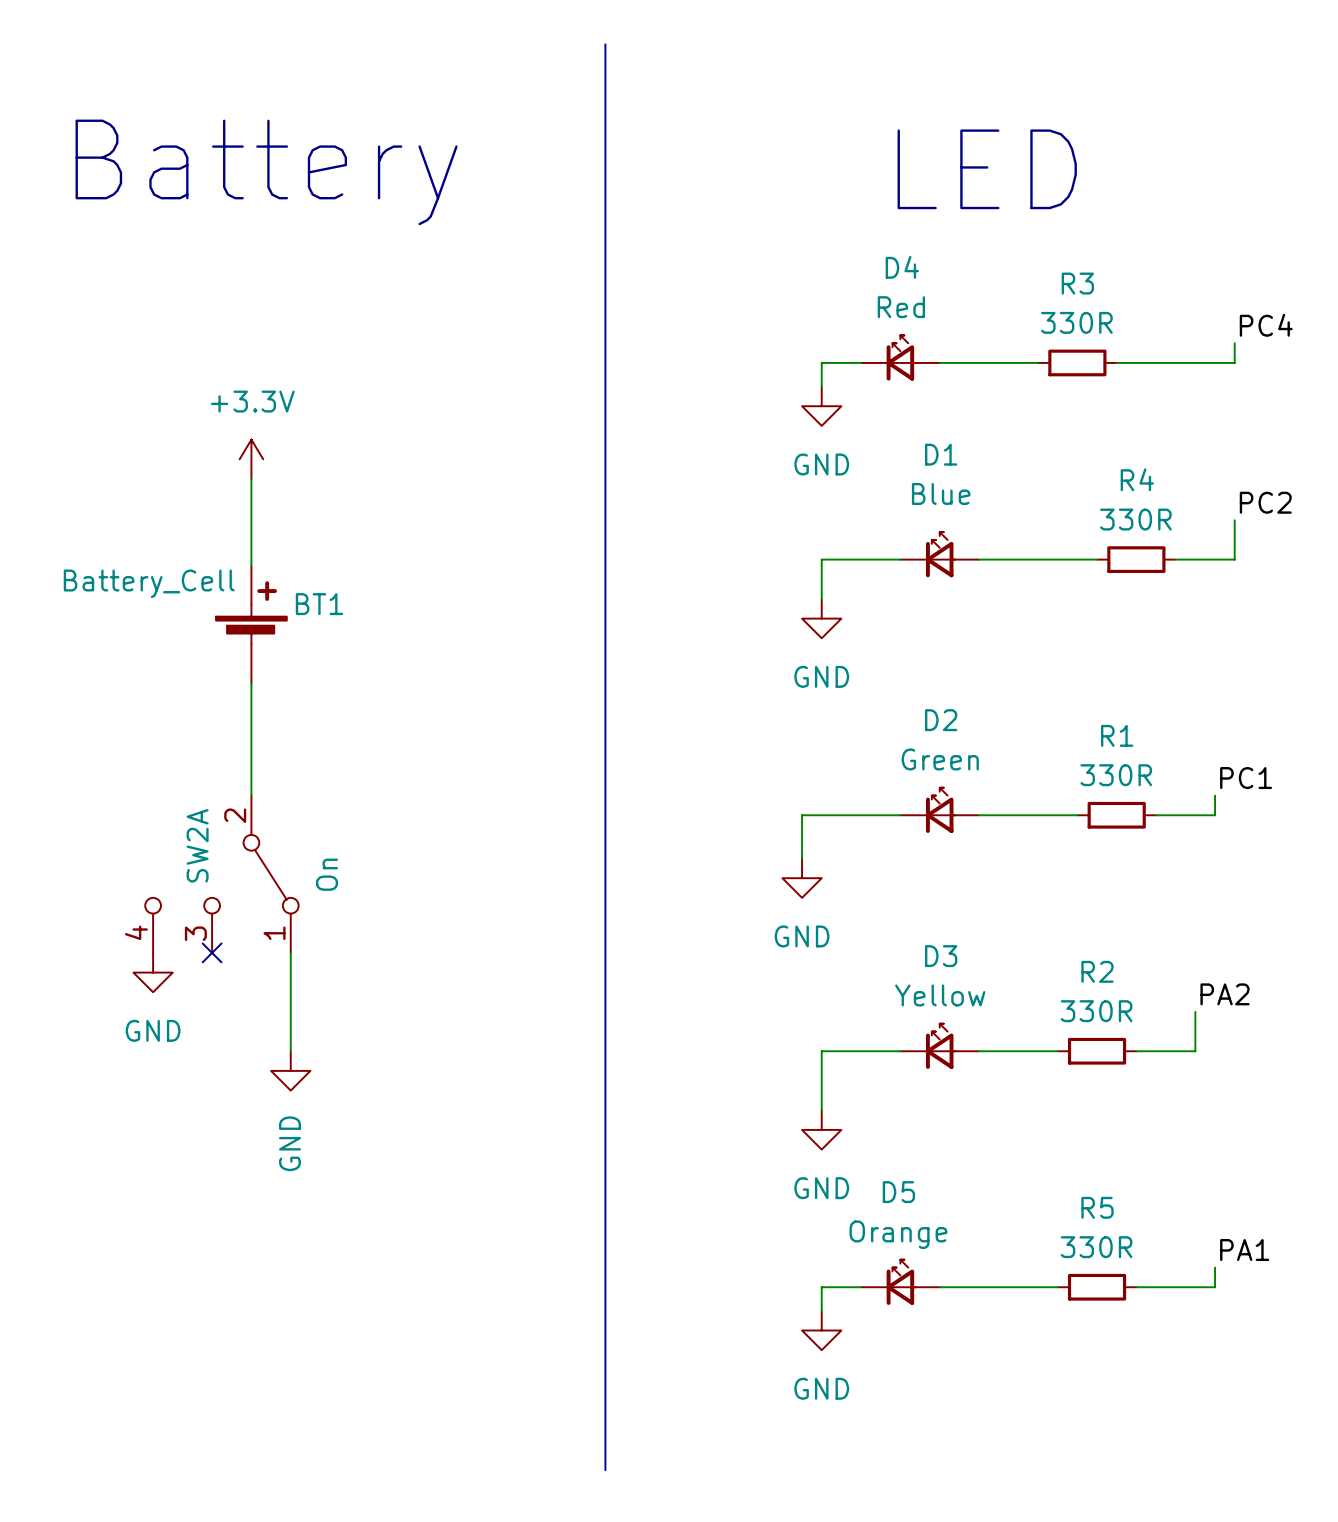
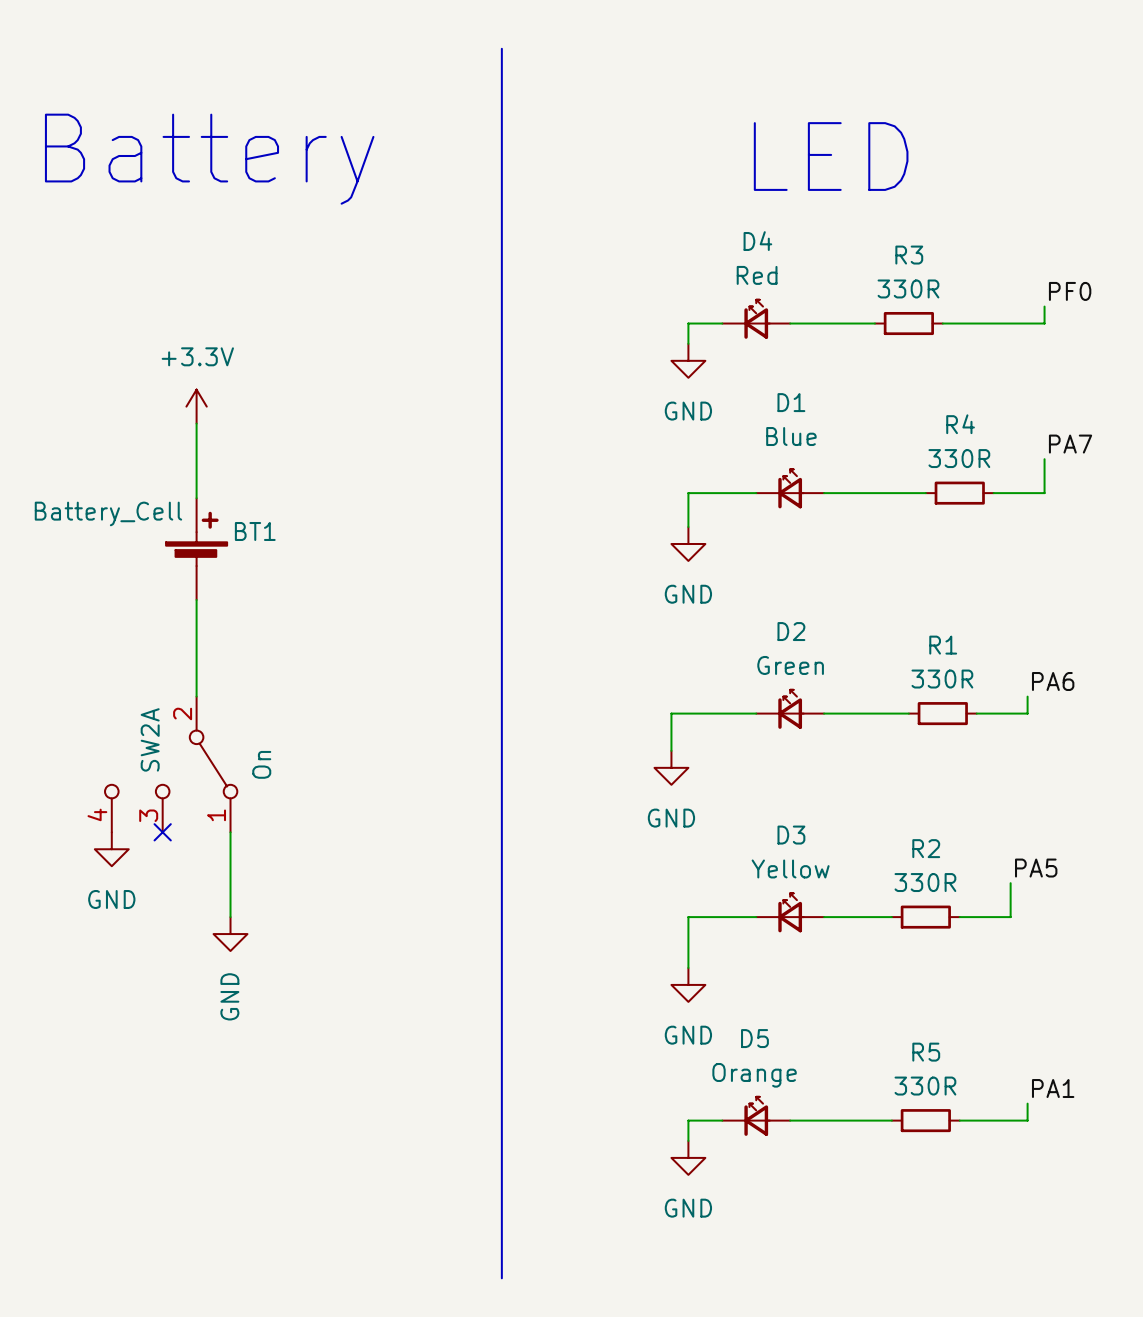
label: PC4 (1266, 325) -> PF0 (1070, 291)
label: PC2 (1265, 502) -> PA7 (1070, 444)
label: PC1 (1246, 778) -> PA6 (1053, 681)
label: PA2 (1225, 994) -> PA5 (1036, 868)

